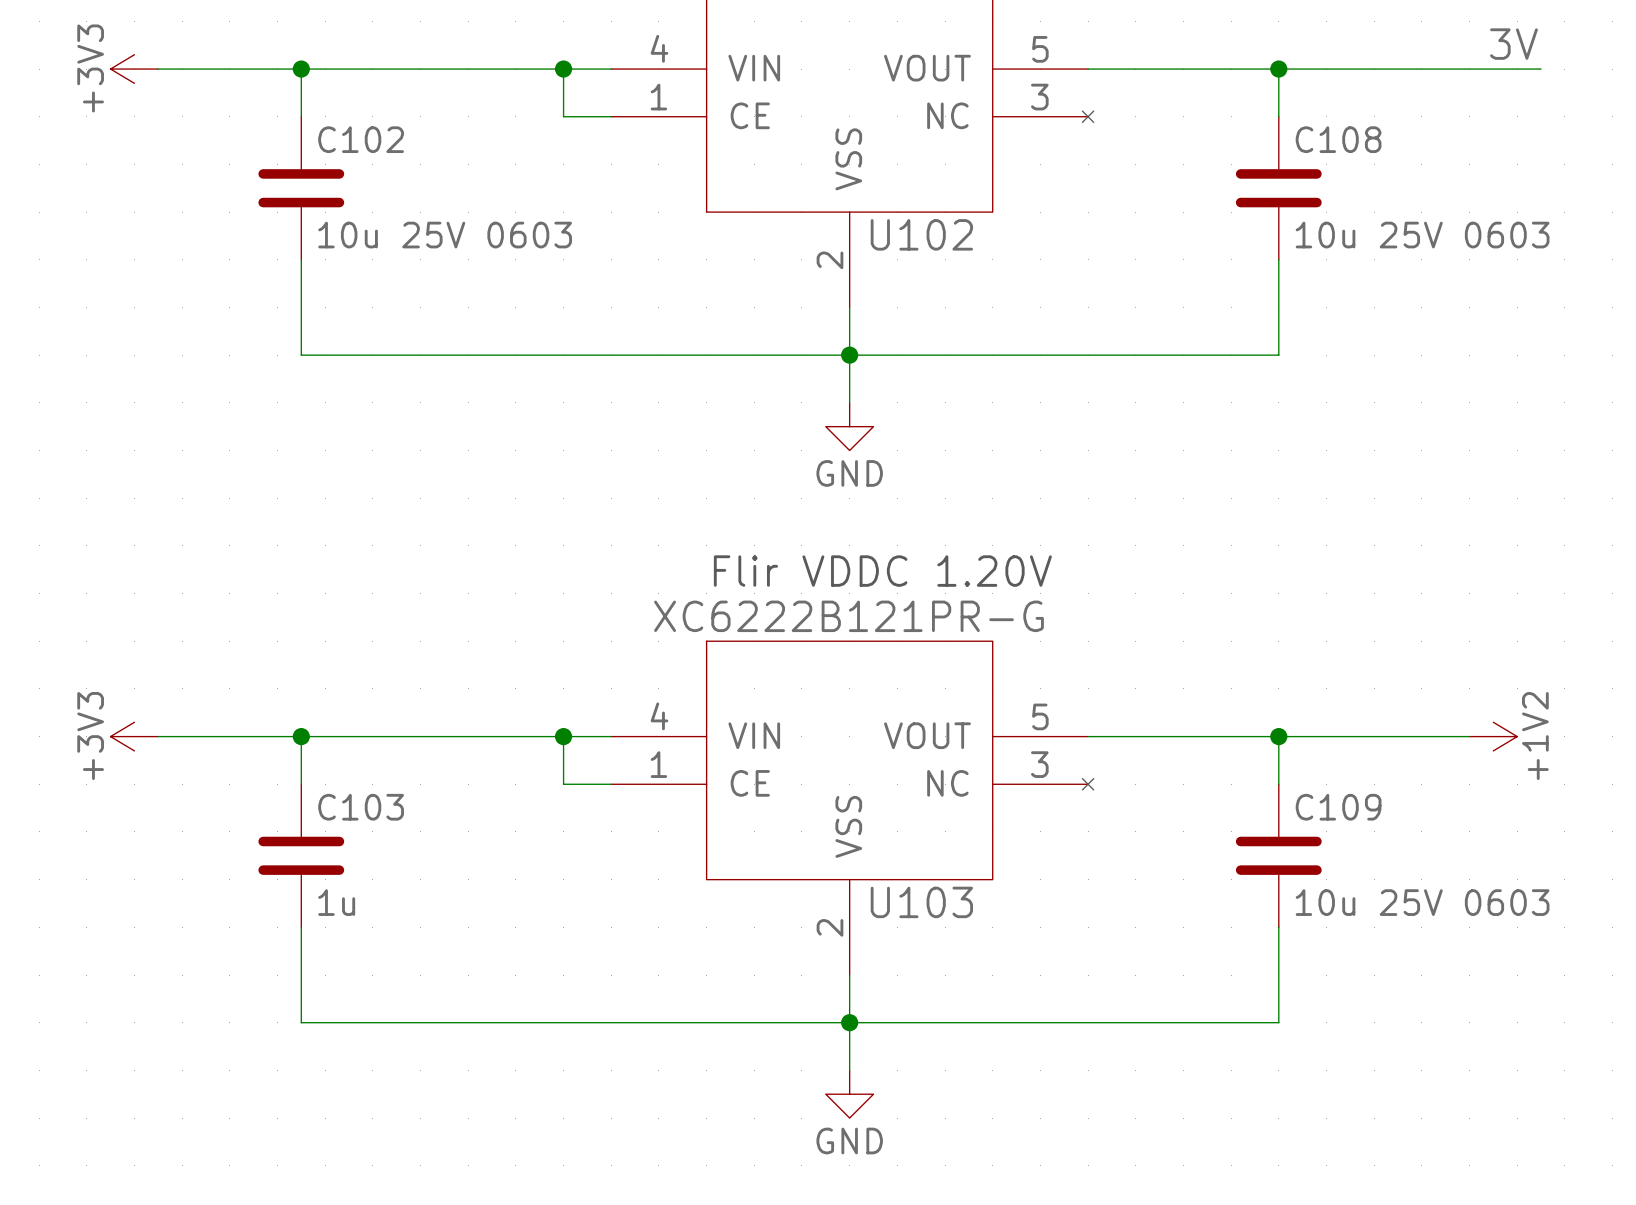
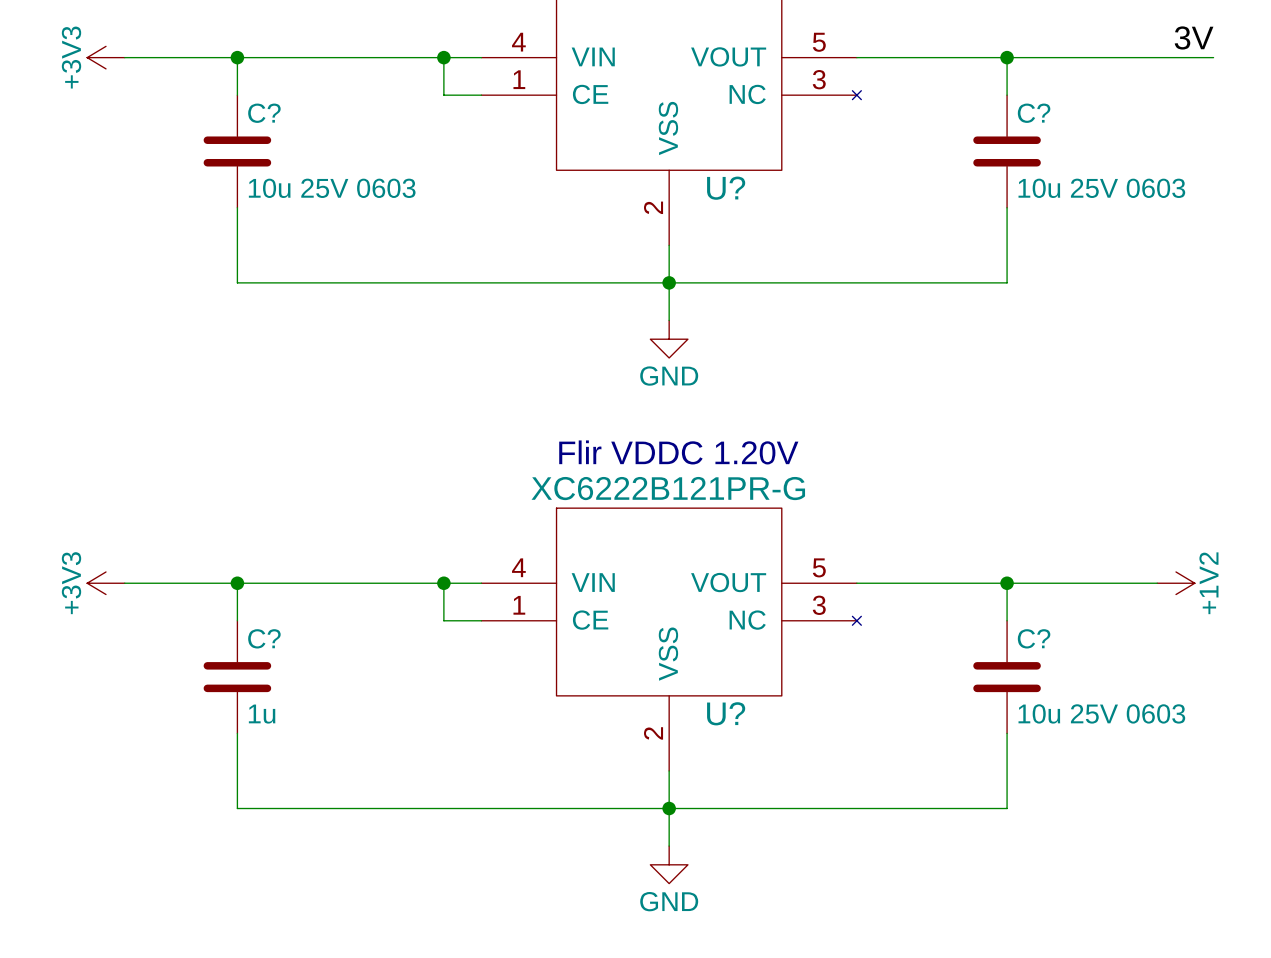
C102 name: C102 (361, 139) -> C? (264, 113)
C108 name: C108 (1338, 139) -> C? (1034, 113)
U102 name: U102 (921, 234) -> U? (726, 188)
C103 name: C103 (361, 807) -> C? (264, 638)
C109 name: C109 (1338, 807) -> C? (1034, 638)
U103 name: U103 (921, 902) -> U? (726, 713)

